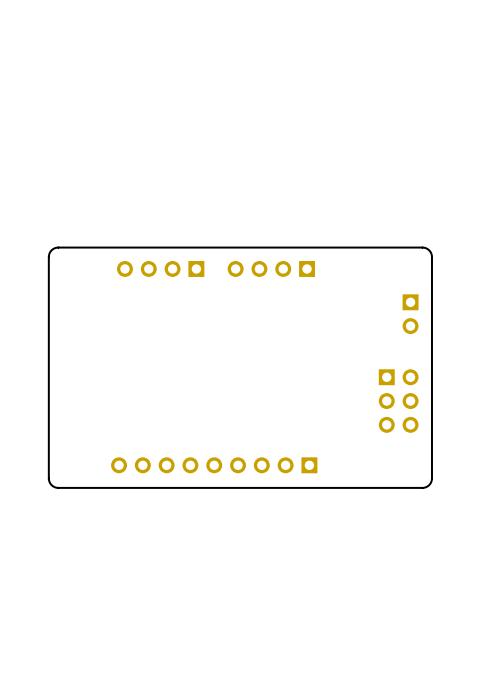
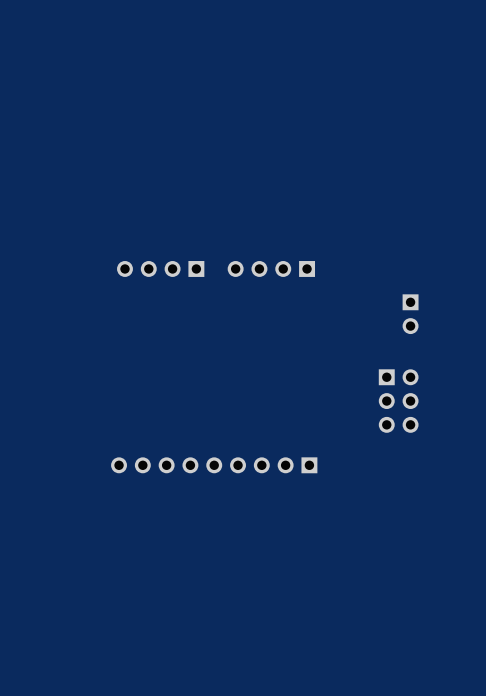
board edge: (422, 247) (53, 248) (48, 257) (50, 483) (58, 487) (427, 486) (431, 478) (431, 257) (429, 250) (422, 247) -> none

